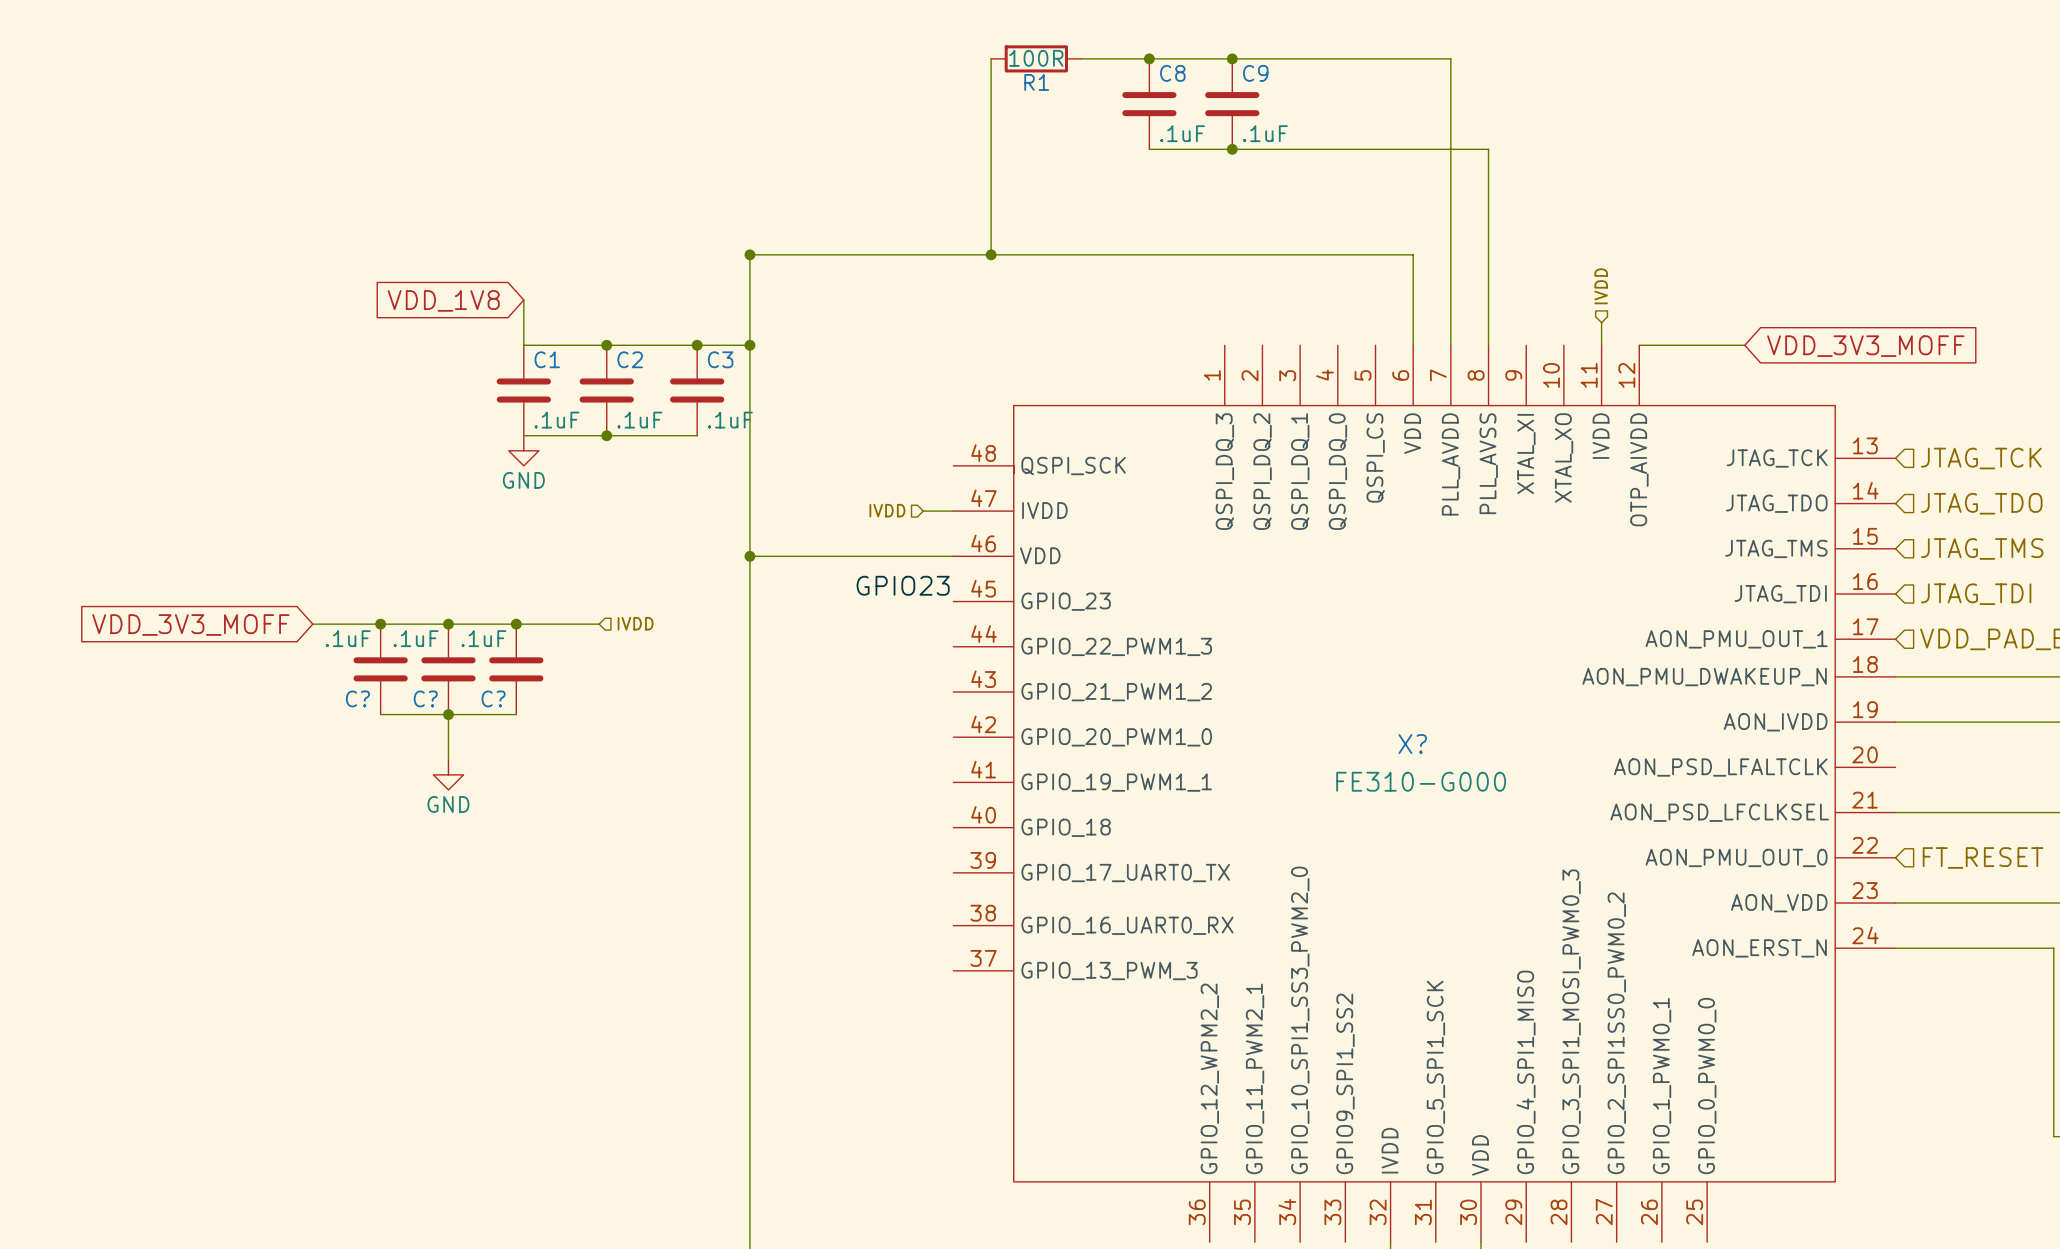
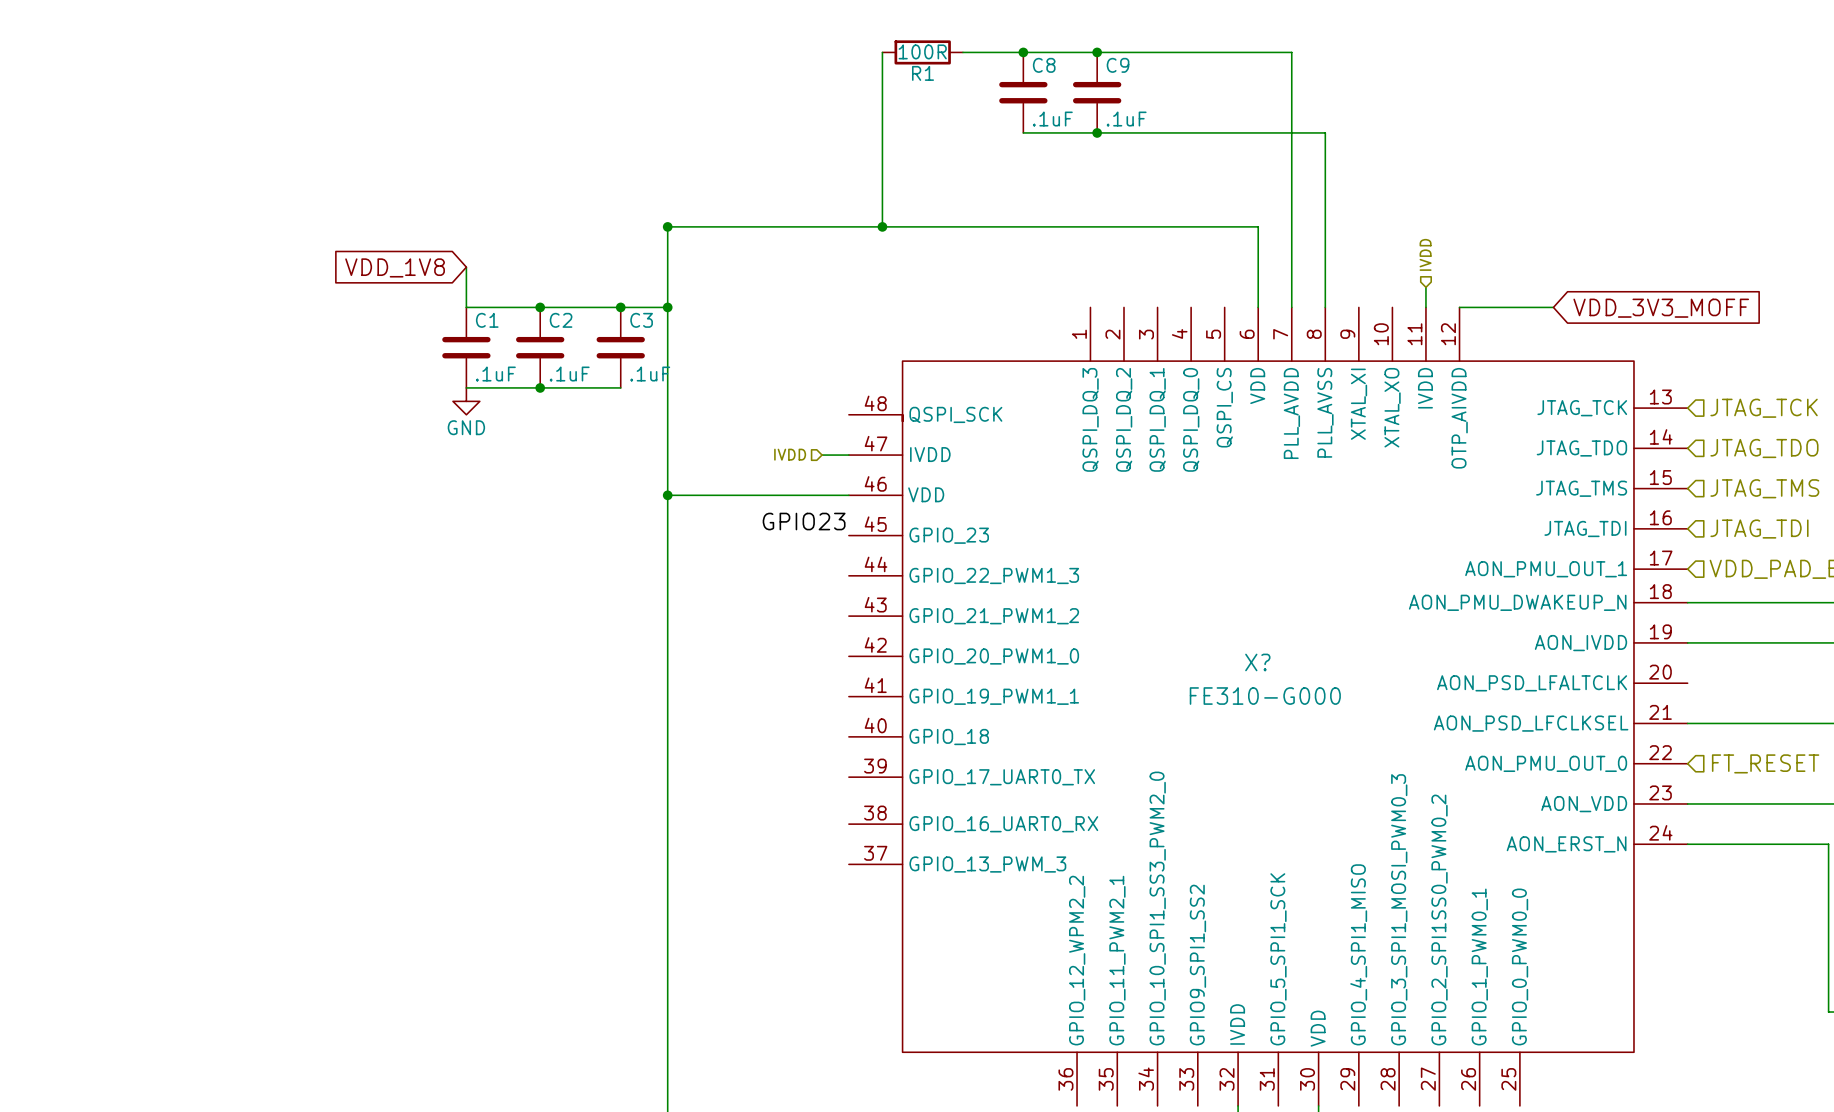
hierarchical label: IVDD (635, 623) -> none
wire: (312, 624) (599, 624) -> none
junction: (380, 624) -> none
junction: (448, 624) -> none
junction: (516, 624) -> none
global label: VDD_3V3_MOFF (190, 625) -> none
C?: .1uF (380, 669) -> none
C?: .1uF (448, 669) -> none
C?: .1uF (516, 669) -> none
wire: (380, 714) (516, 714) -> none
wire: (448, 714) (448, 759) -> none
junction: (448, 714) -> none
power symbol: GND (448, 774) -> none

